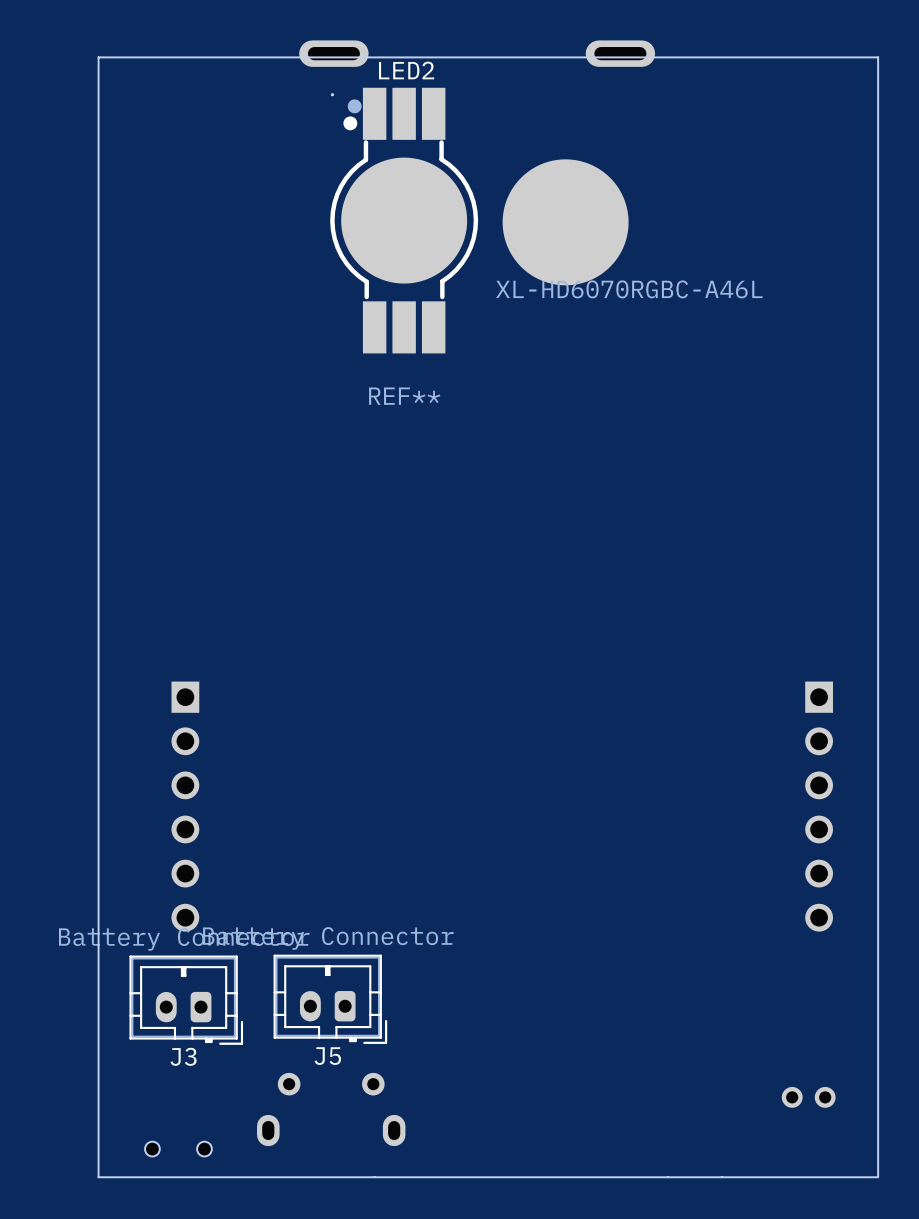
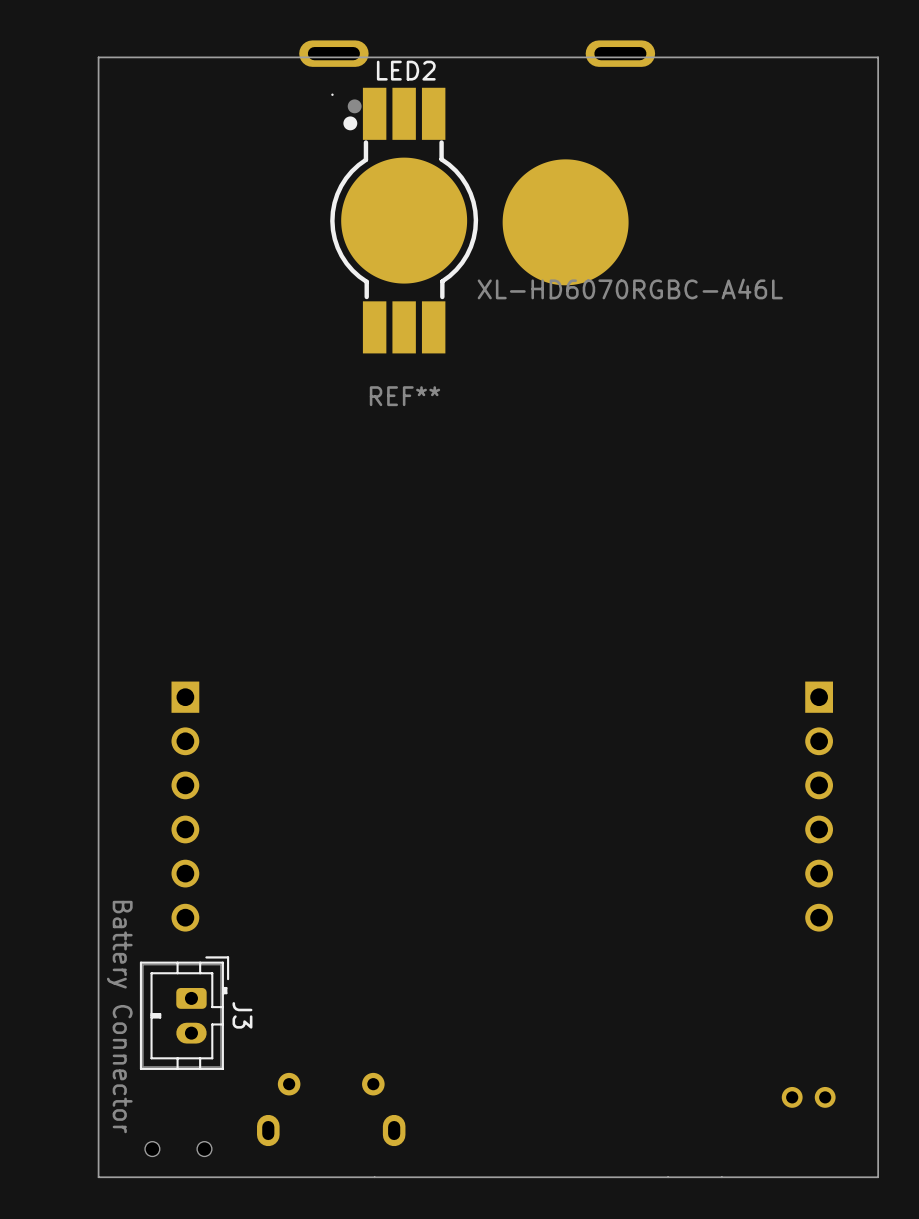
J5: Battery Connector (330, 999) -> none
J3 rotation: 0° (186, 1000) -> 90° counterclockwise (184, 1013)

